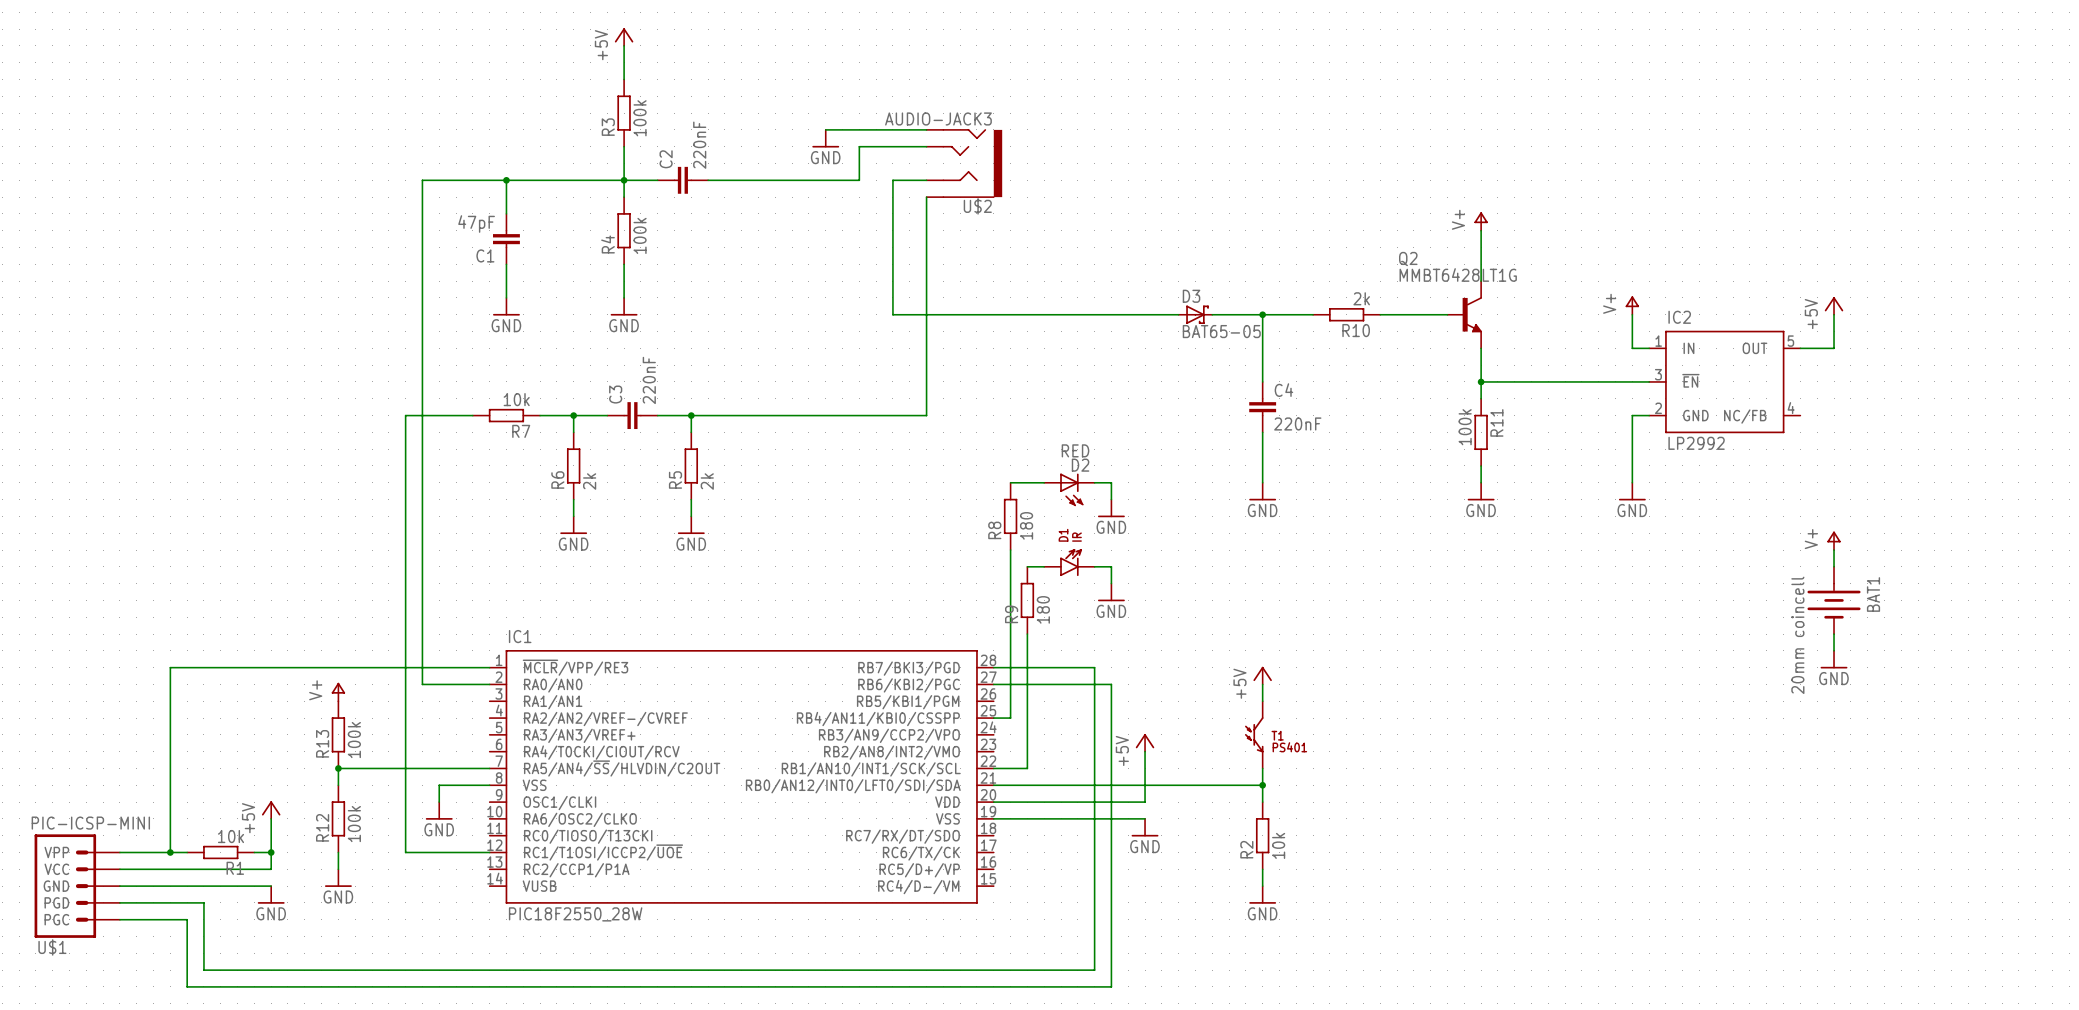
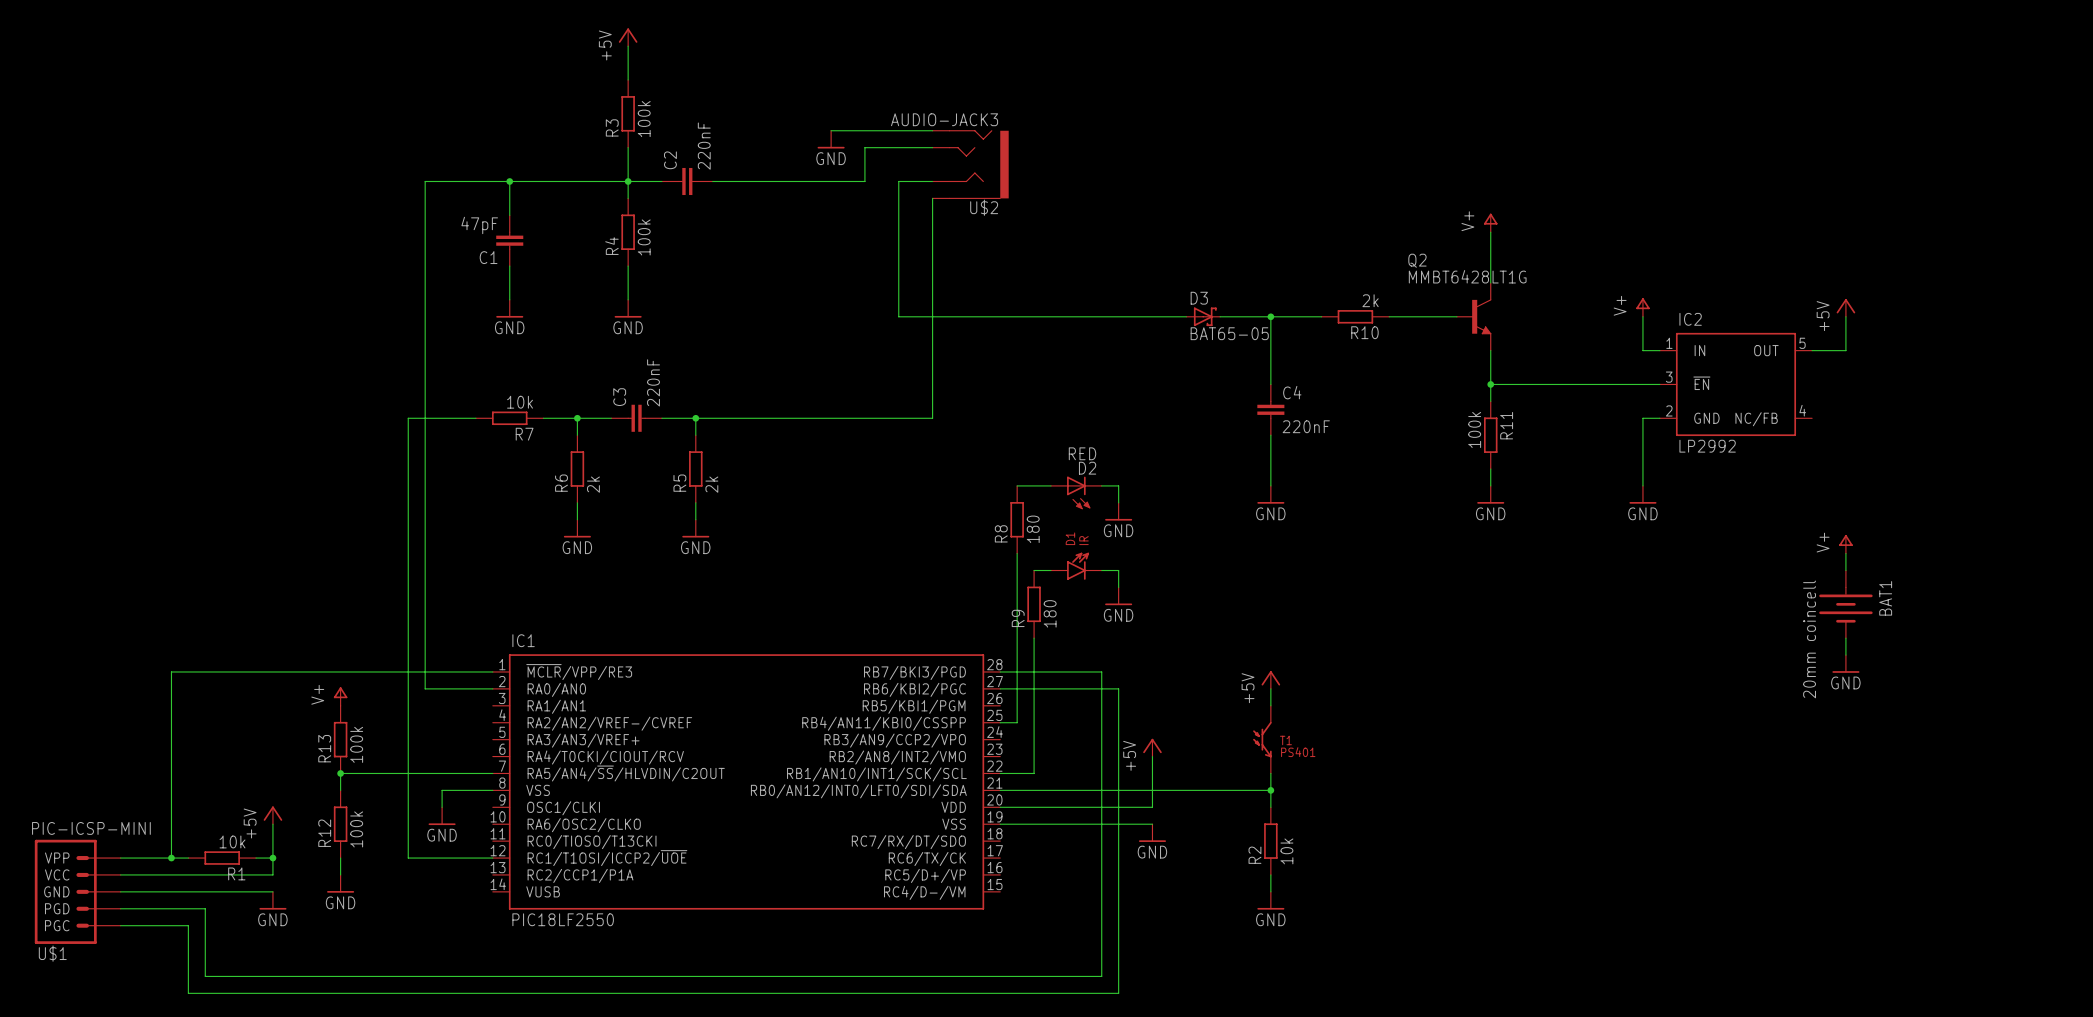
IC1 value: PIC18F2550_28W (575, 914) -> PIC18LF2550 (563, 919)

